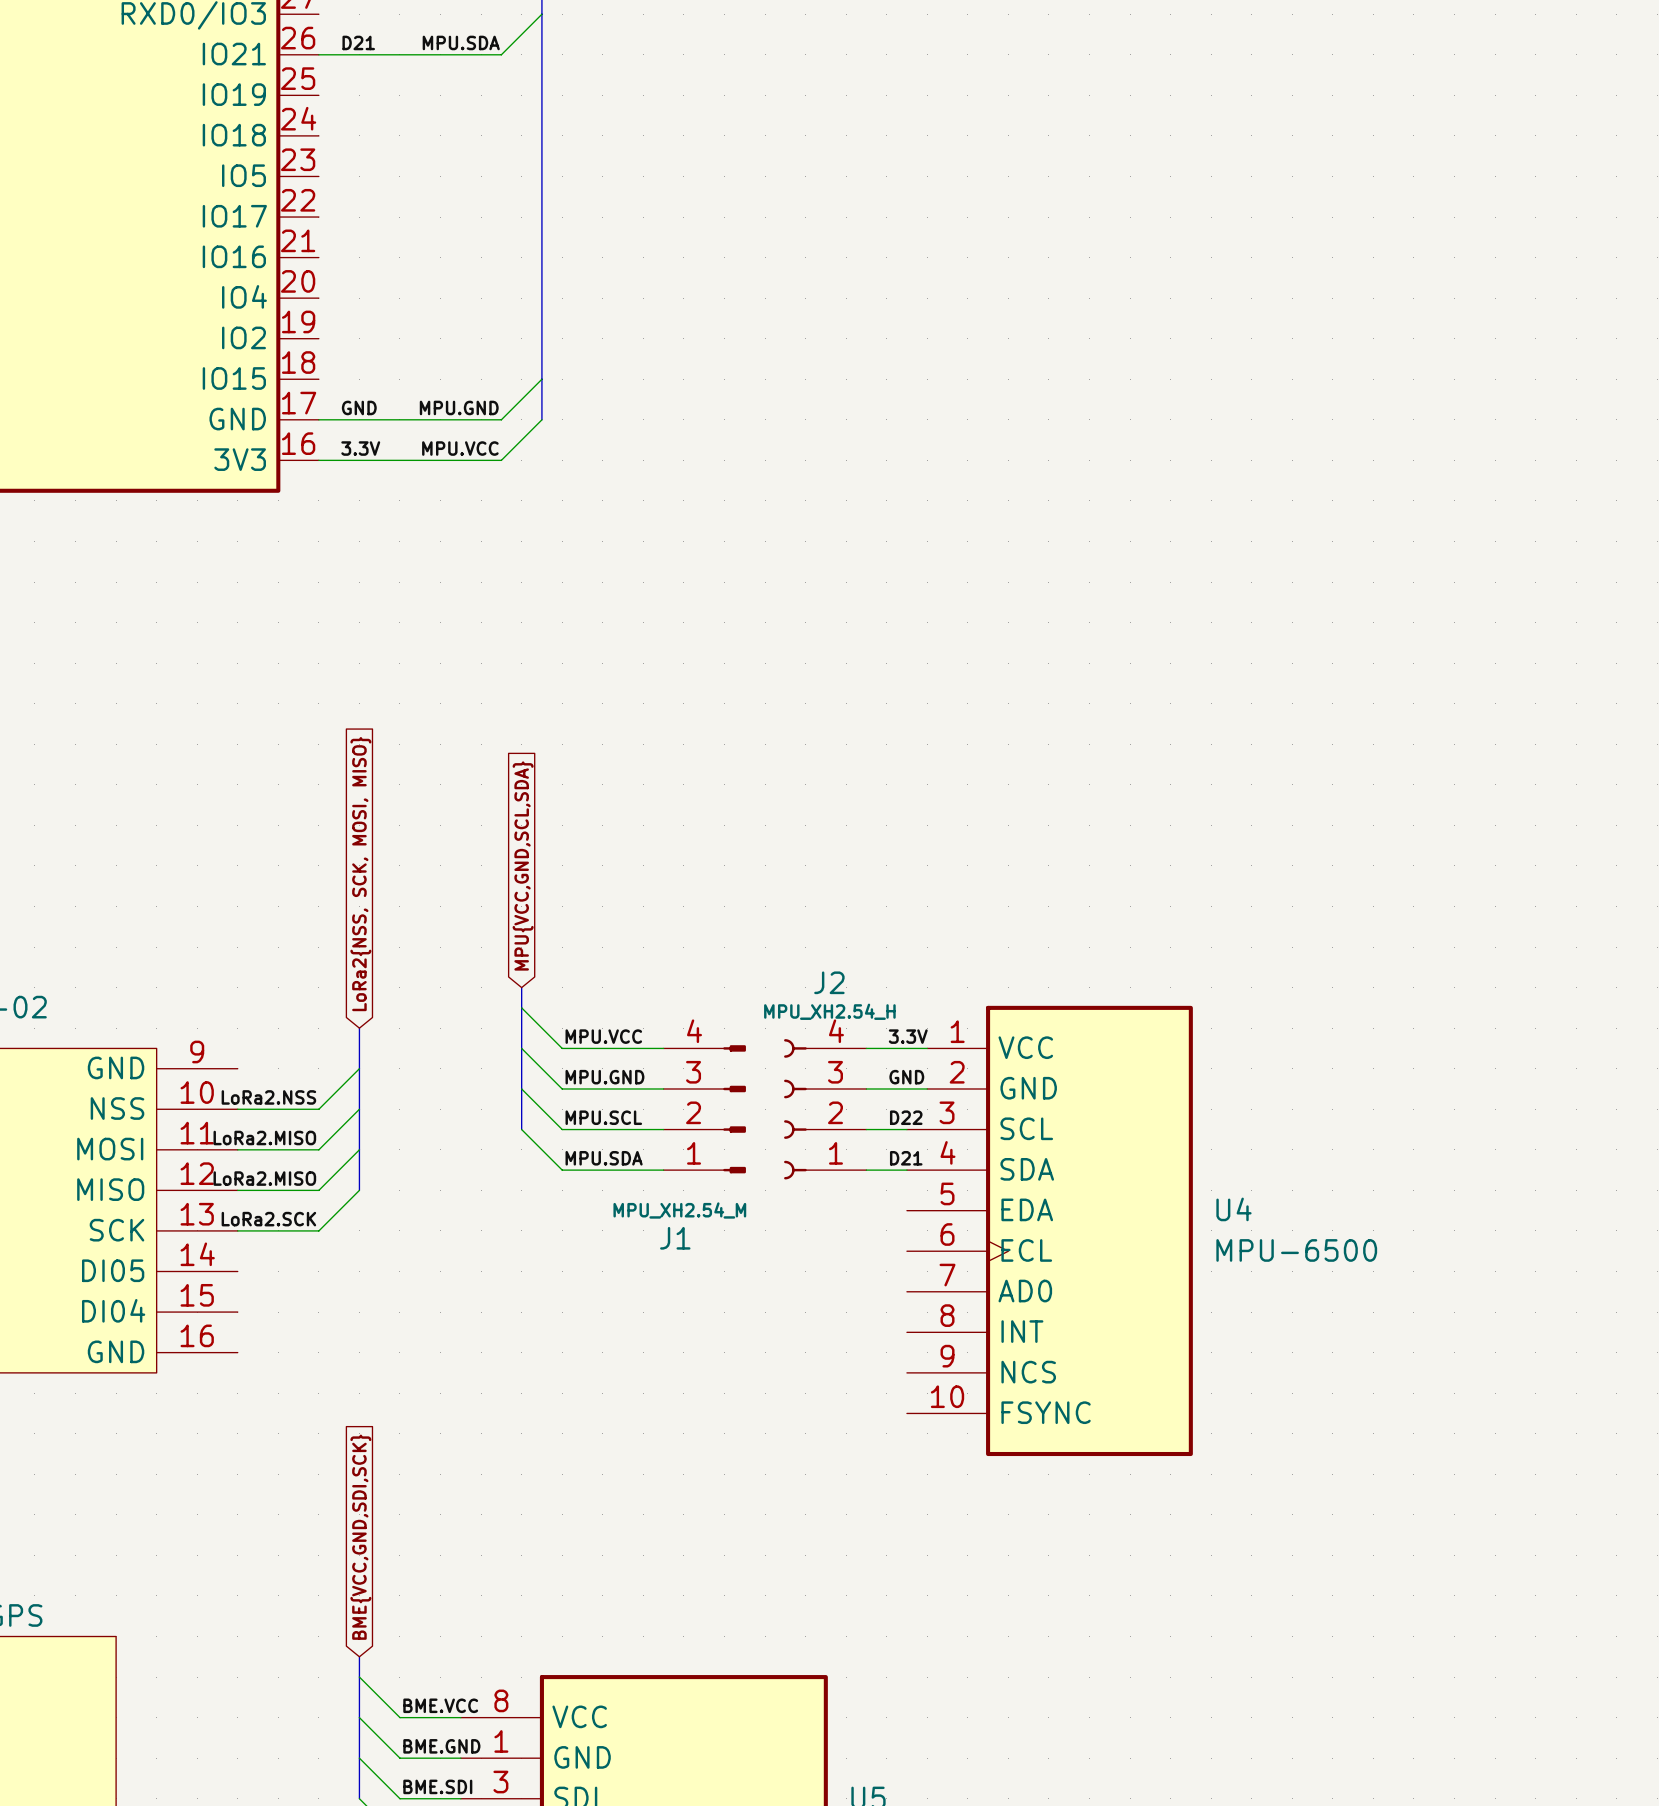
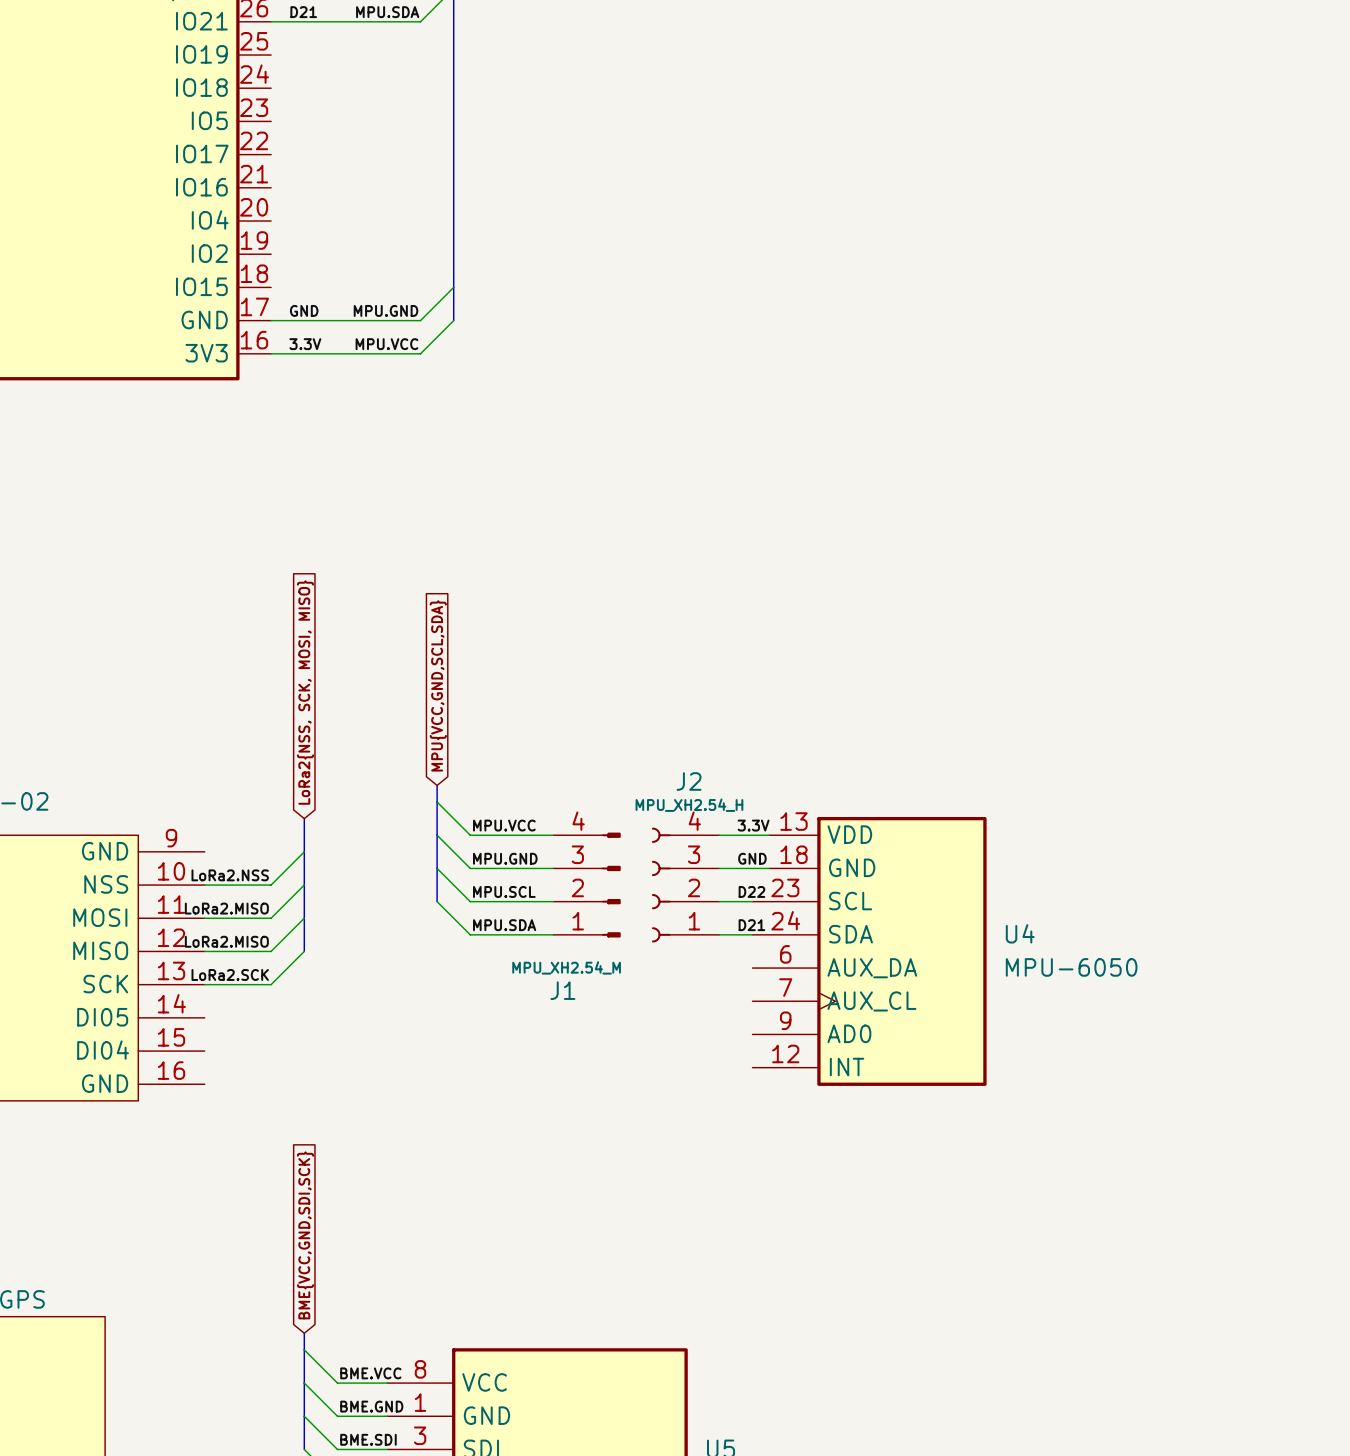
U4 symbol: [906, 1005, 1193, 1457] -> [752, 816, 987, 1086]
U4 value: MPU-6500 (1296, 1250) -> MPU-6050 (1071, 967)

